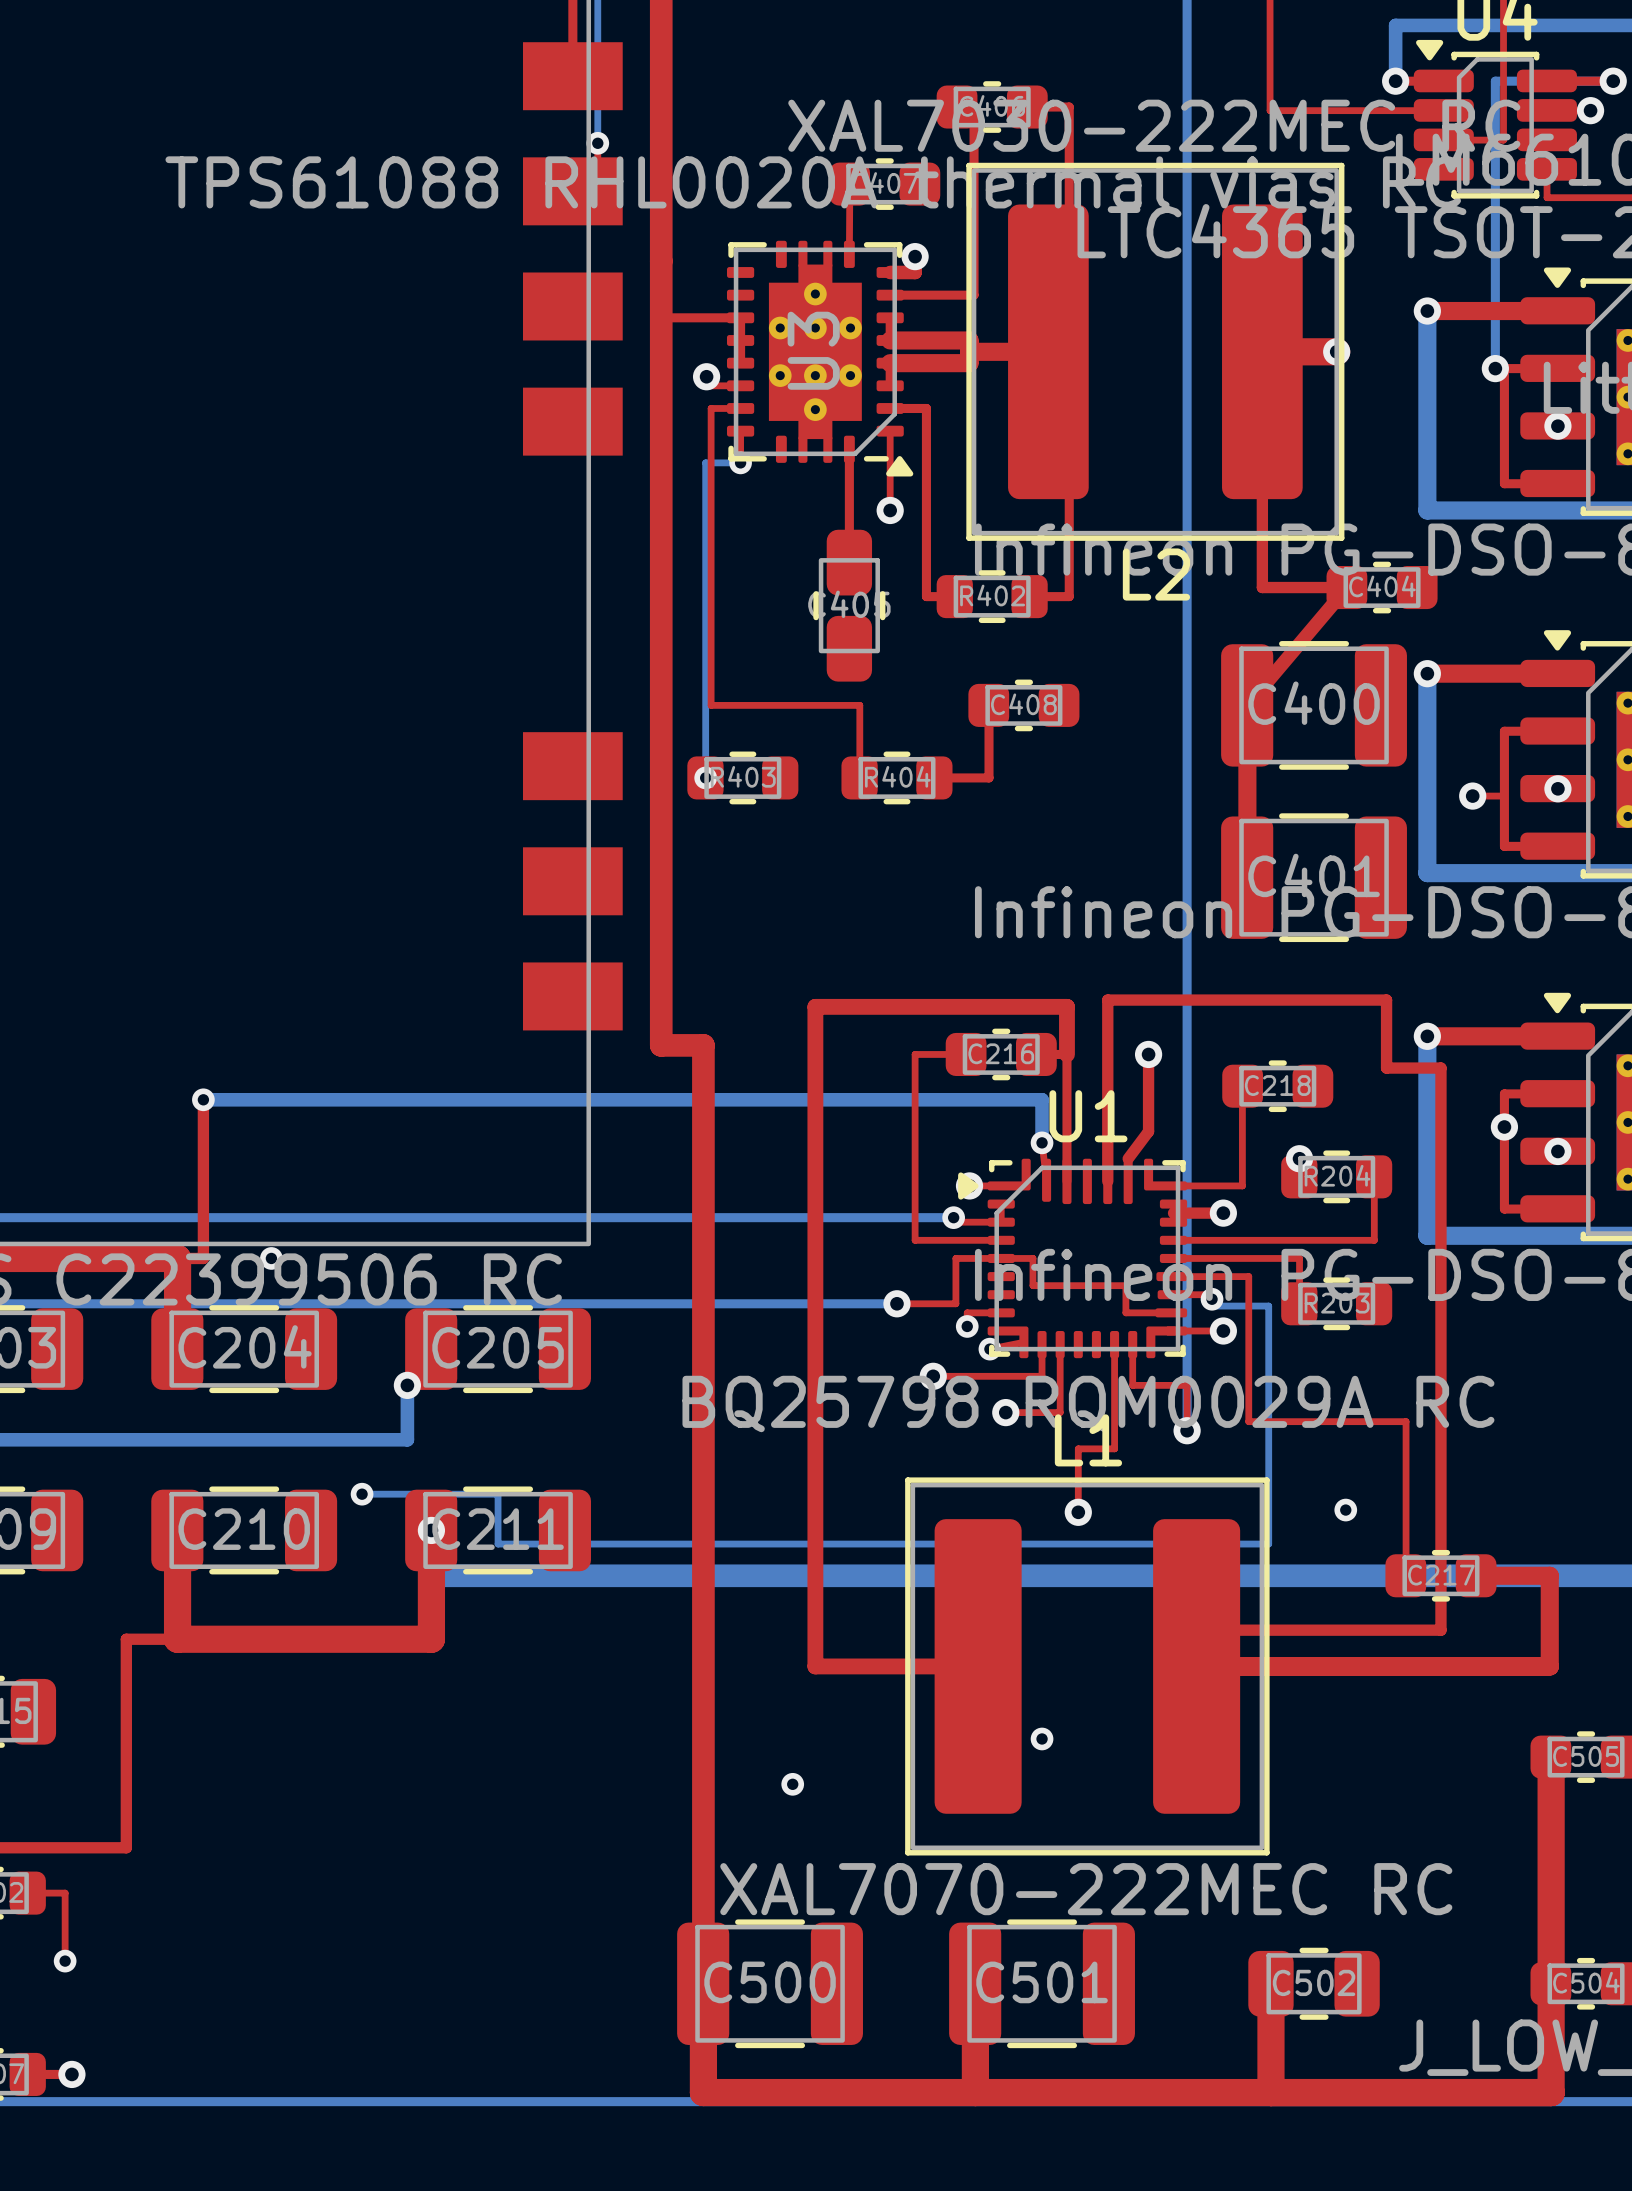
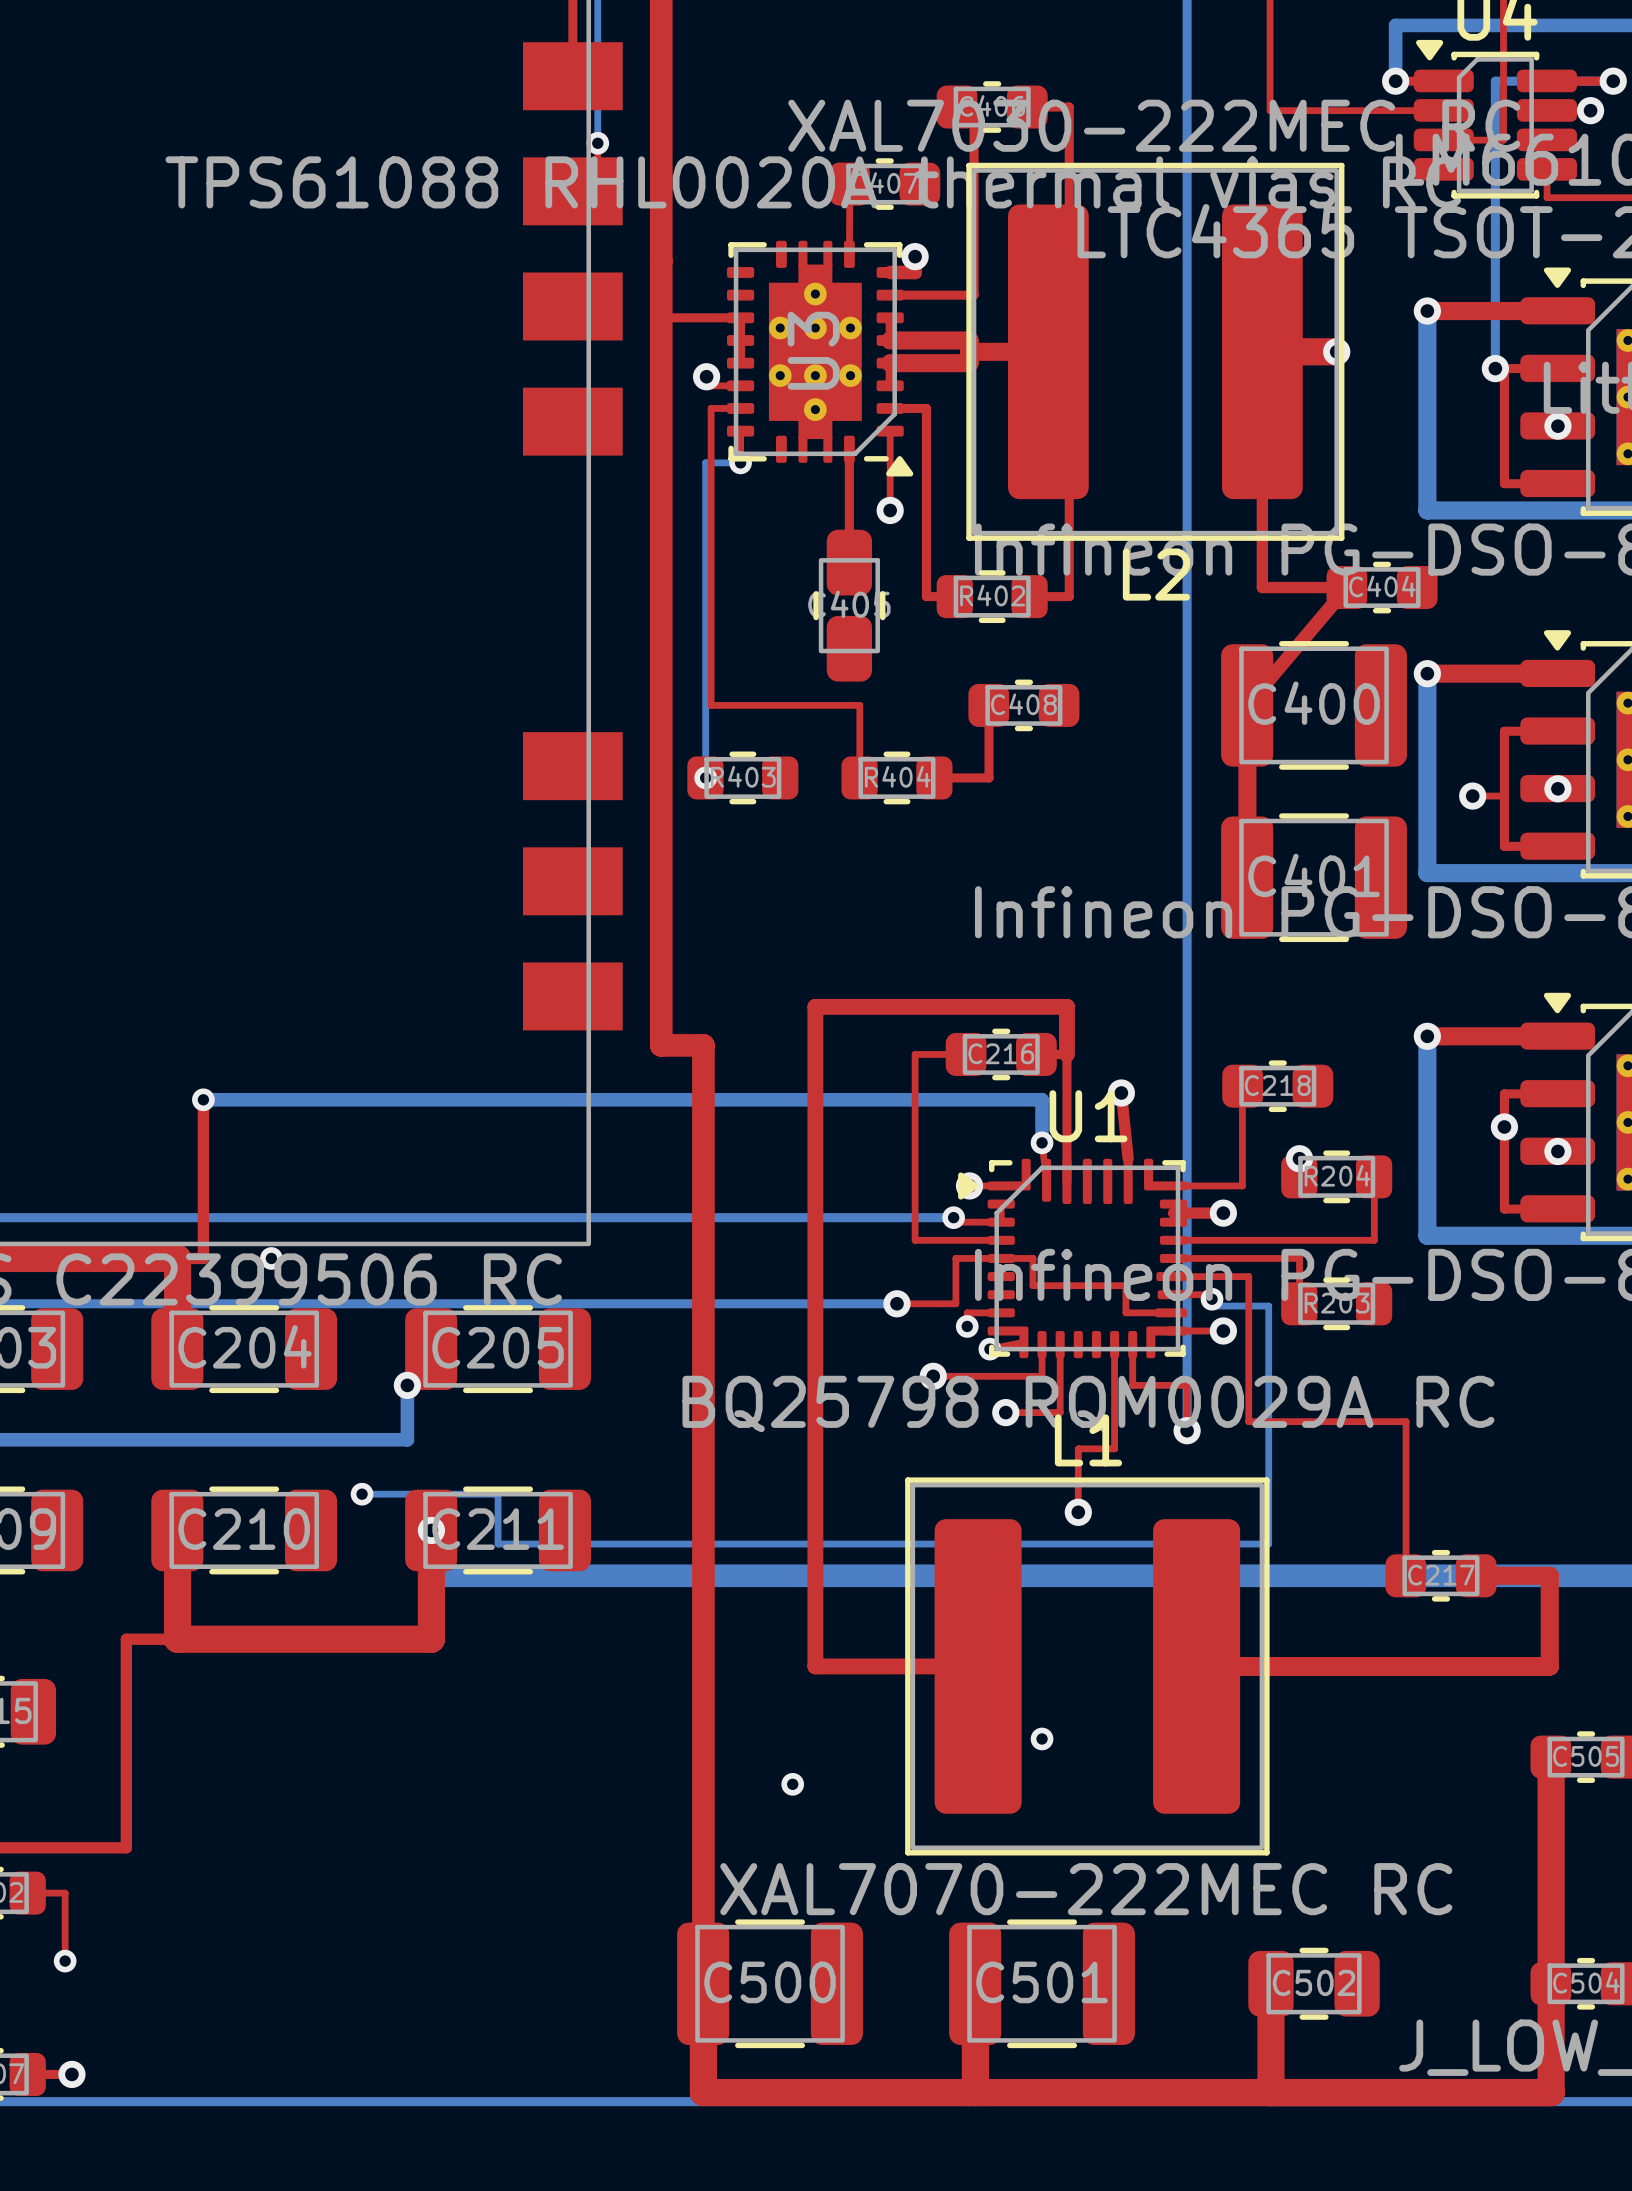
top track: (1148, 1054) (1148, 1131) (1128, 1158) -> (1121, 1092) (1128, 1158)
via position: (1148, 1054) -> (1121, 1092)
top track: (1107, 1181) (1107, 1000) (1386, 1000) (1386, 1068) (1440, 1068) (1440, 1630) (1196, 1630) (1196, 1666) -> none
via: (1345, 1510) -> none

